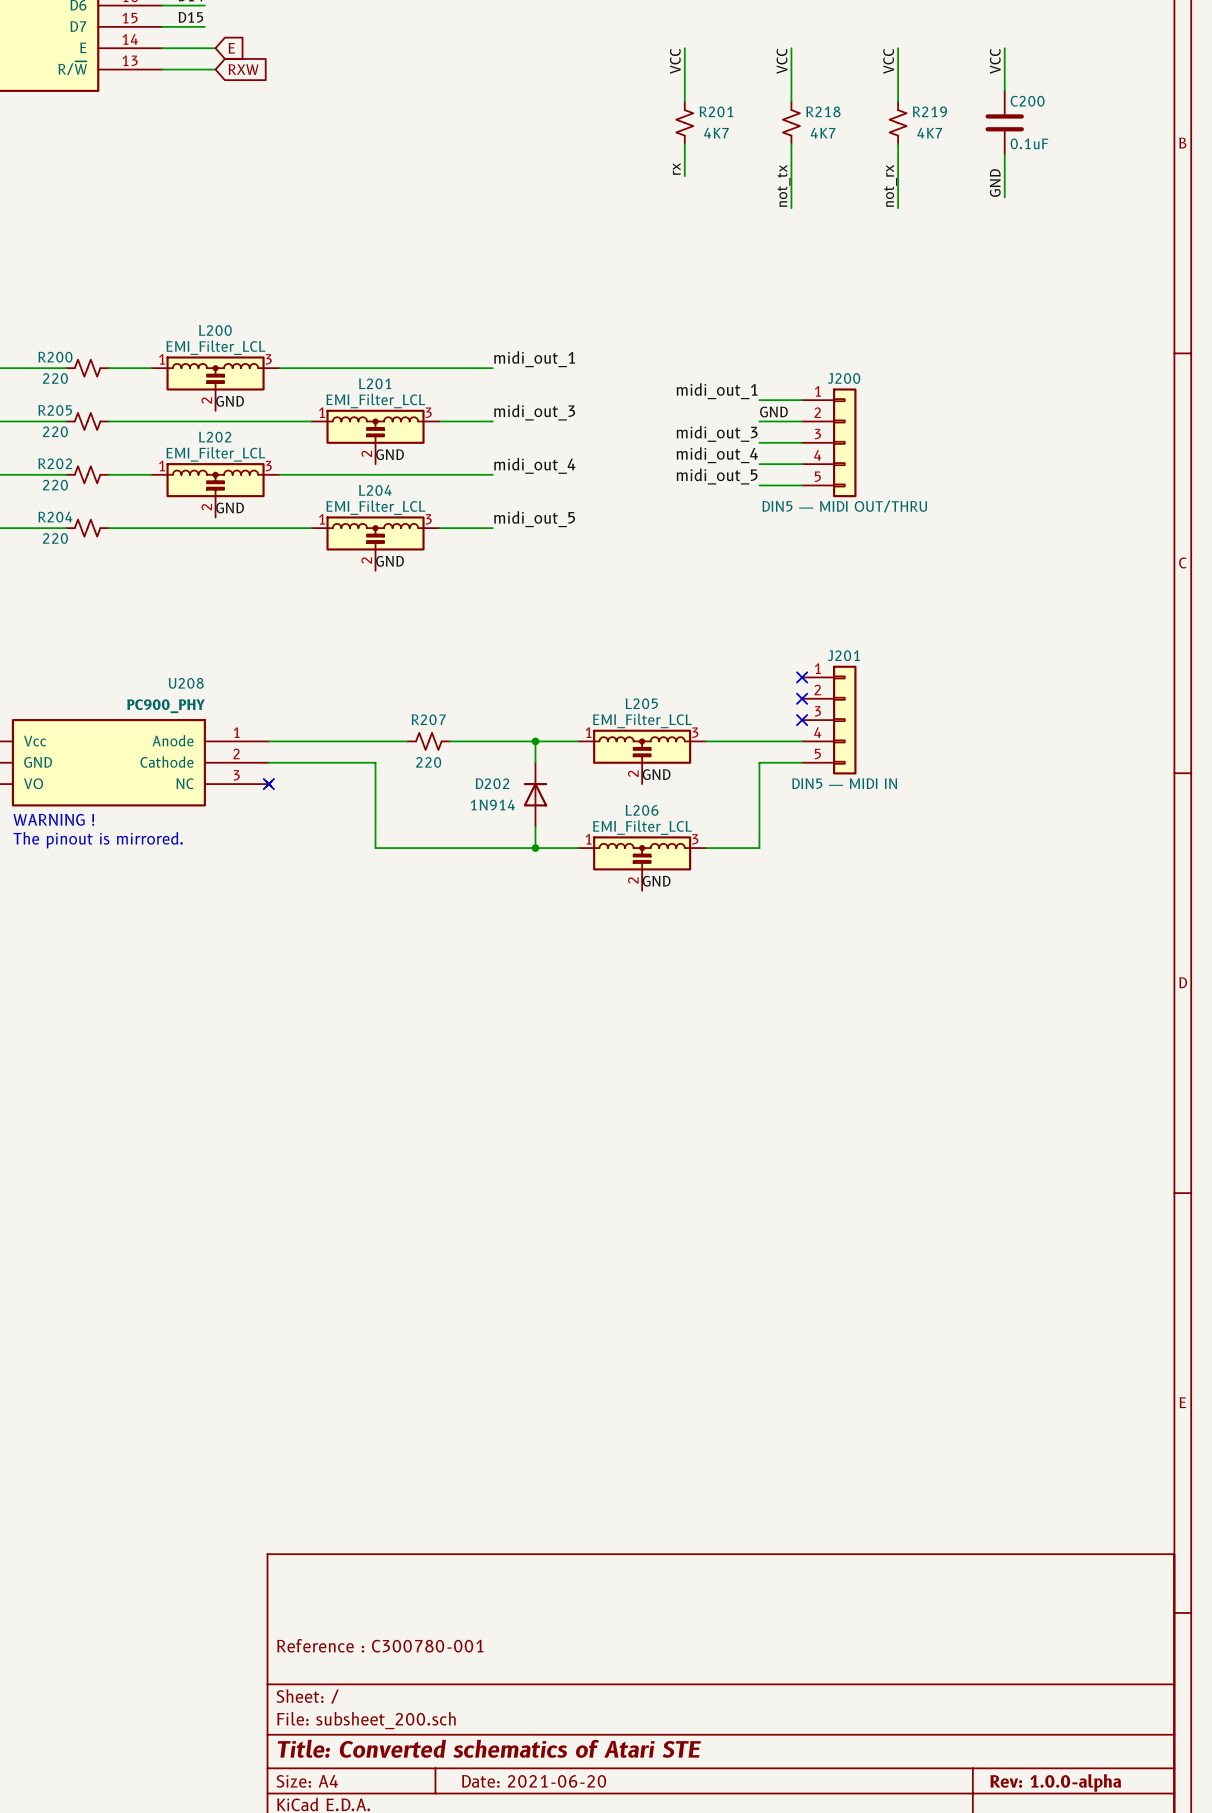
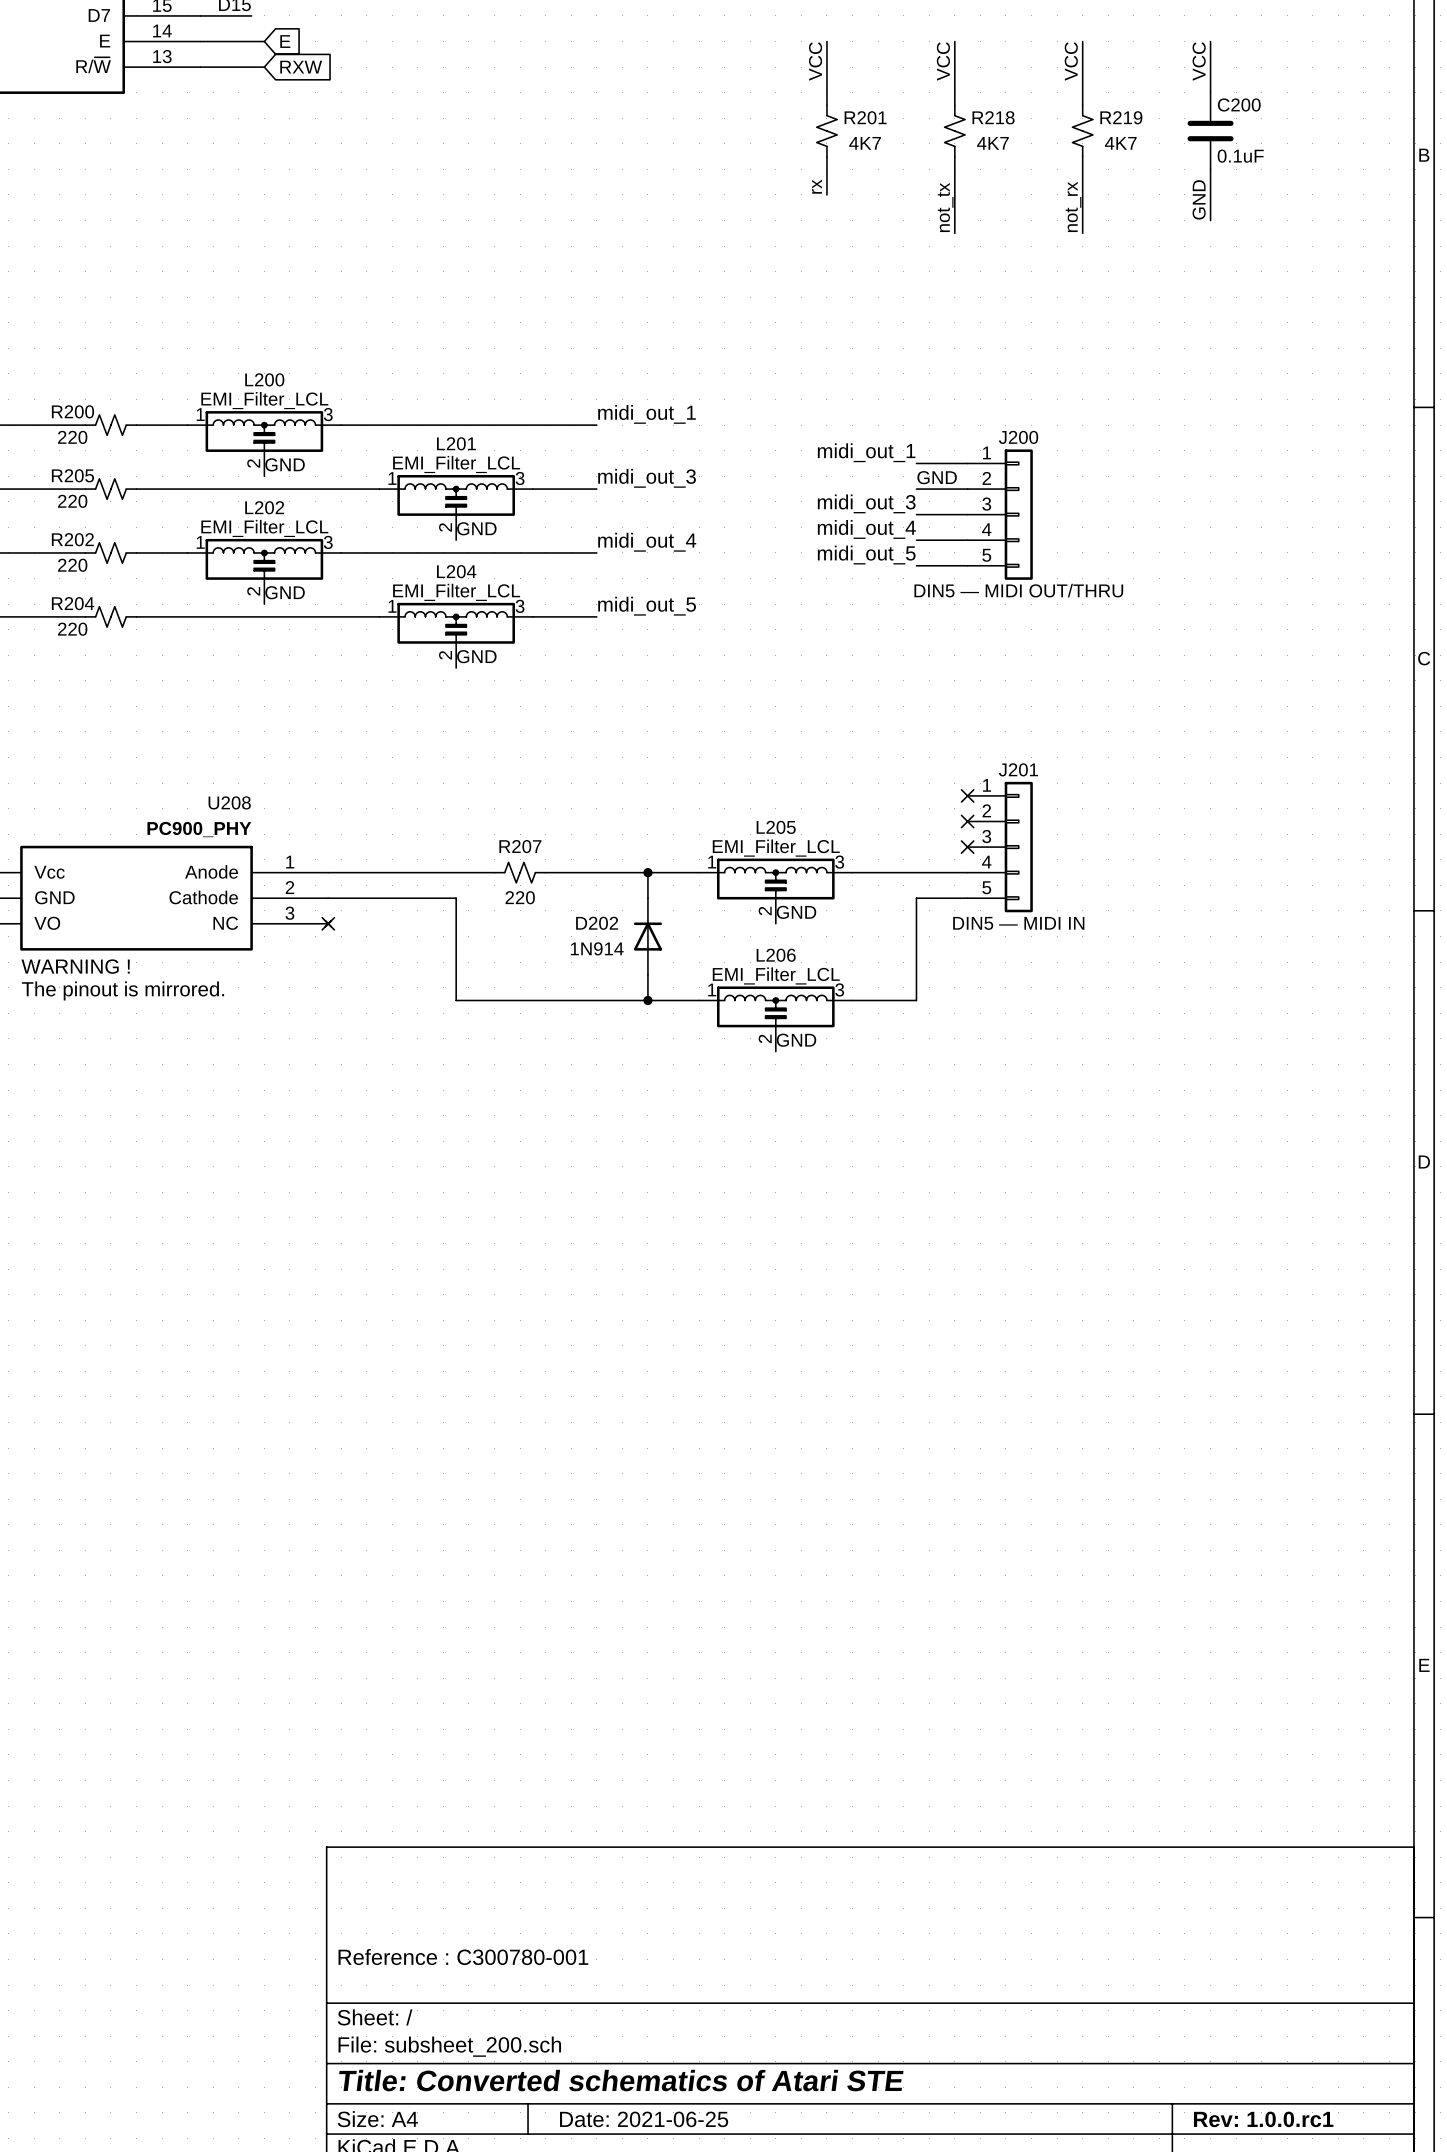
title block: Date: 2021-06-20 (534, 1781) -> Date: 2021-06-25 (644, 2119)
title block: Rev: 1.0.0-alpha (1055, 1782) -> Rev: 1.0.0.rc1 (1263, 2119)

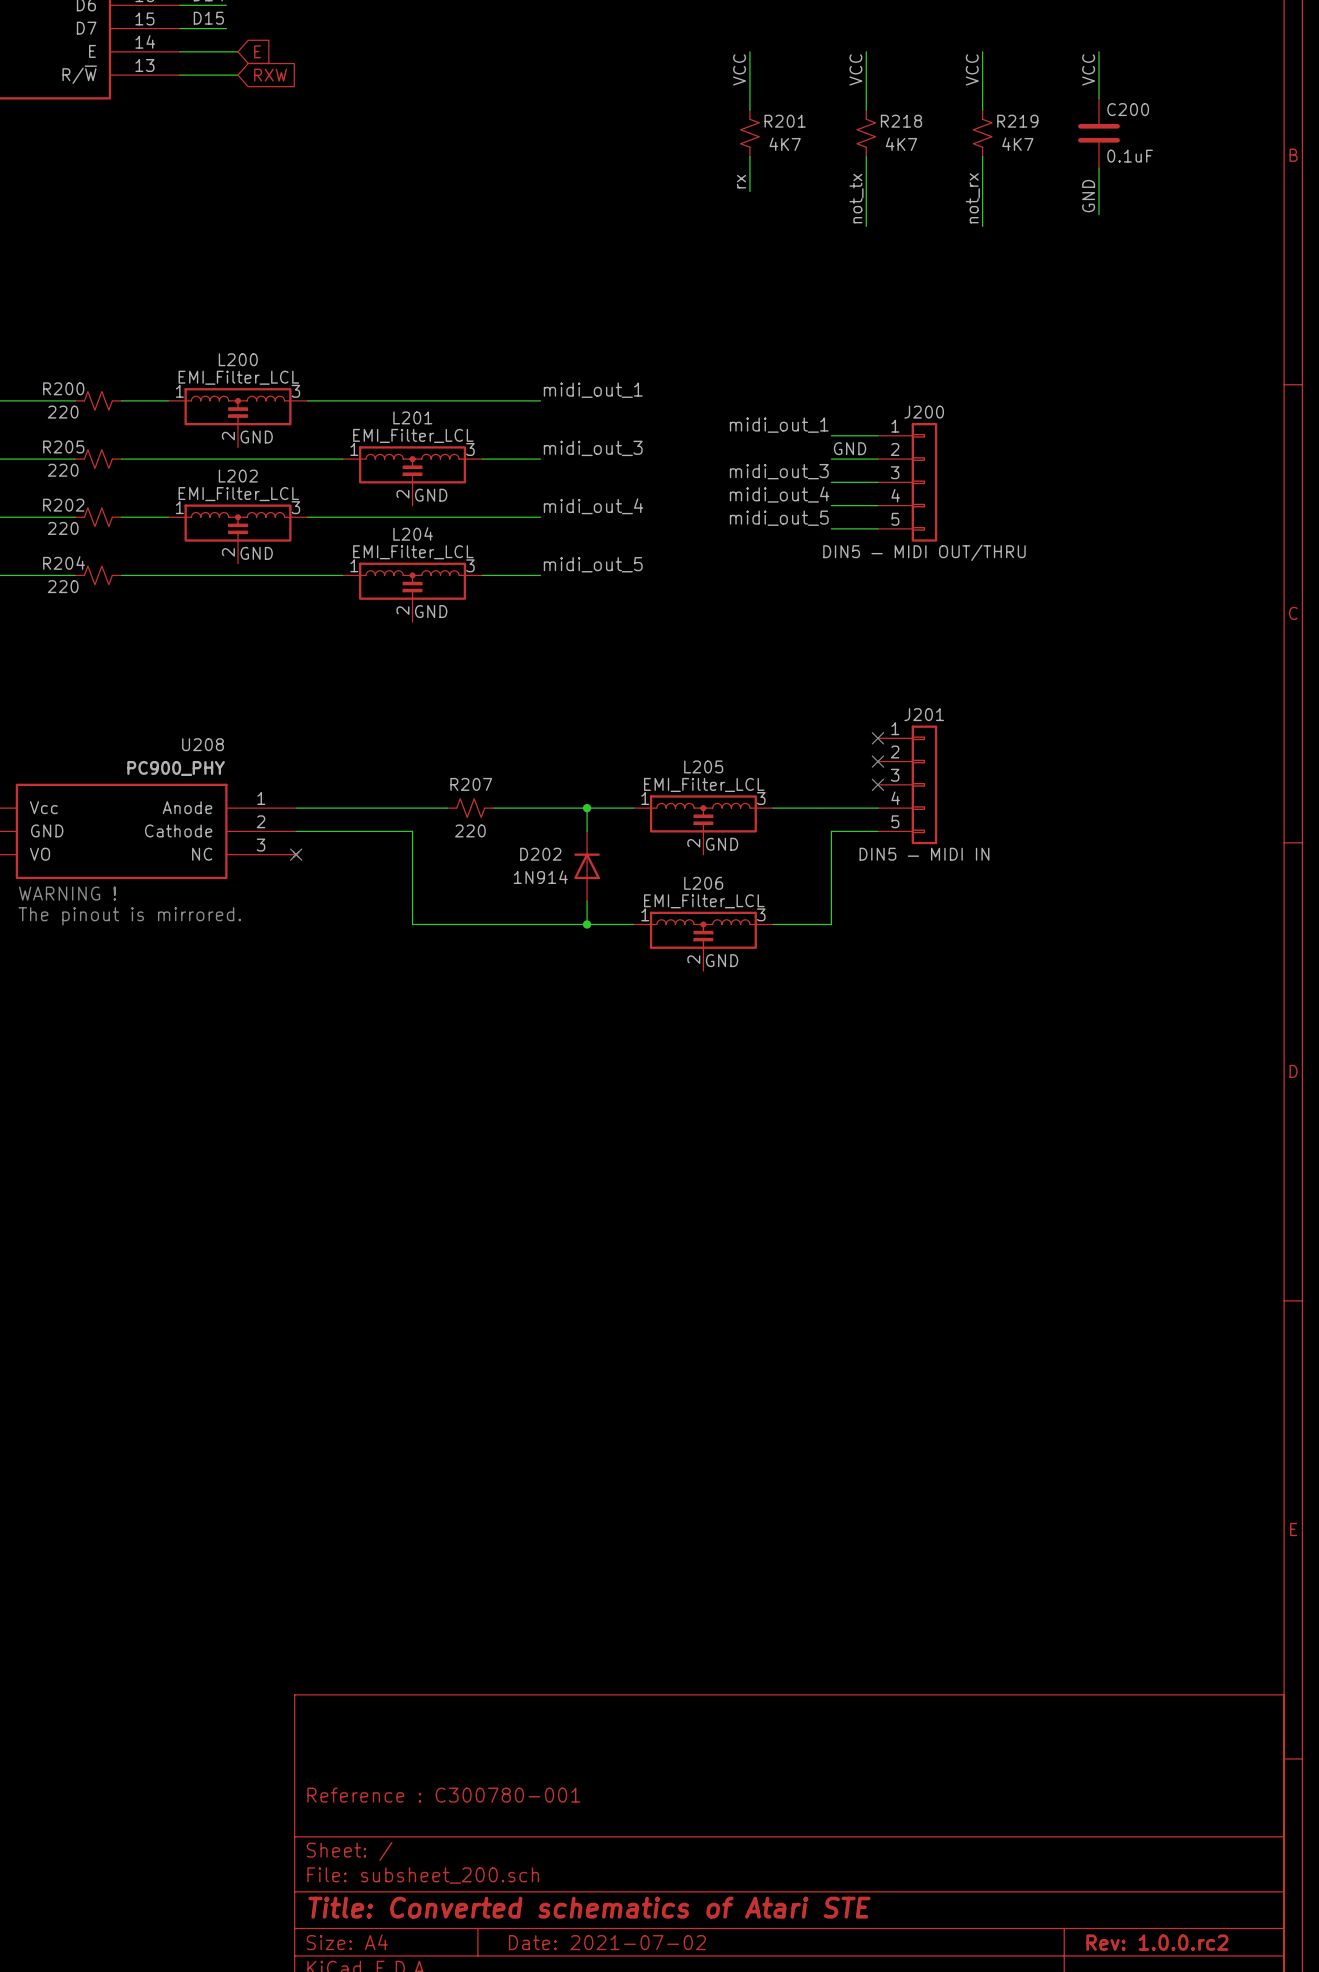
title block: Date: 2021-06-25 (644, 2119) -> Date: 2021-07-02 (607, 1942)
title block: Rev: 1.0.0.rc1 (1263, 2119) -> Rev: 1.0.0.rc2 (1157, 1942)

